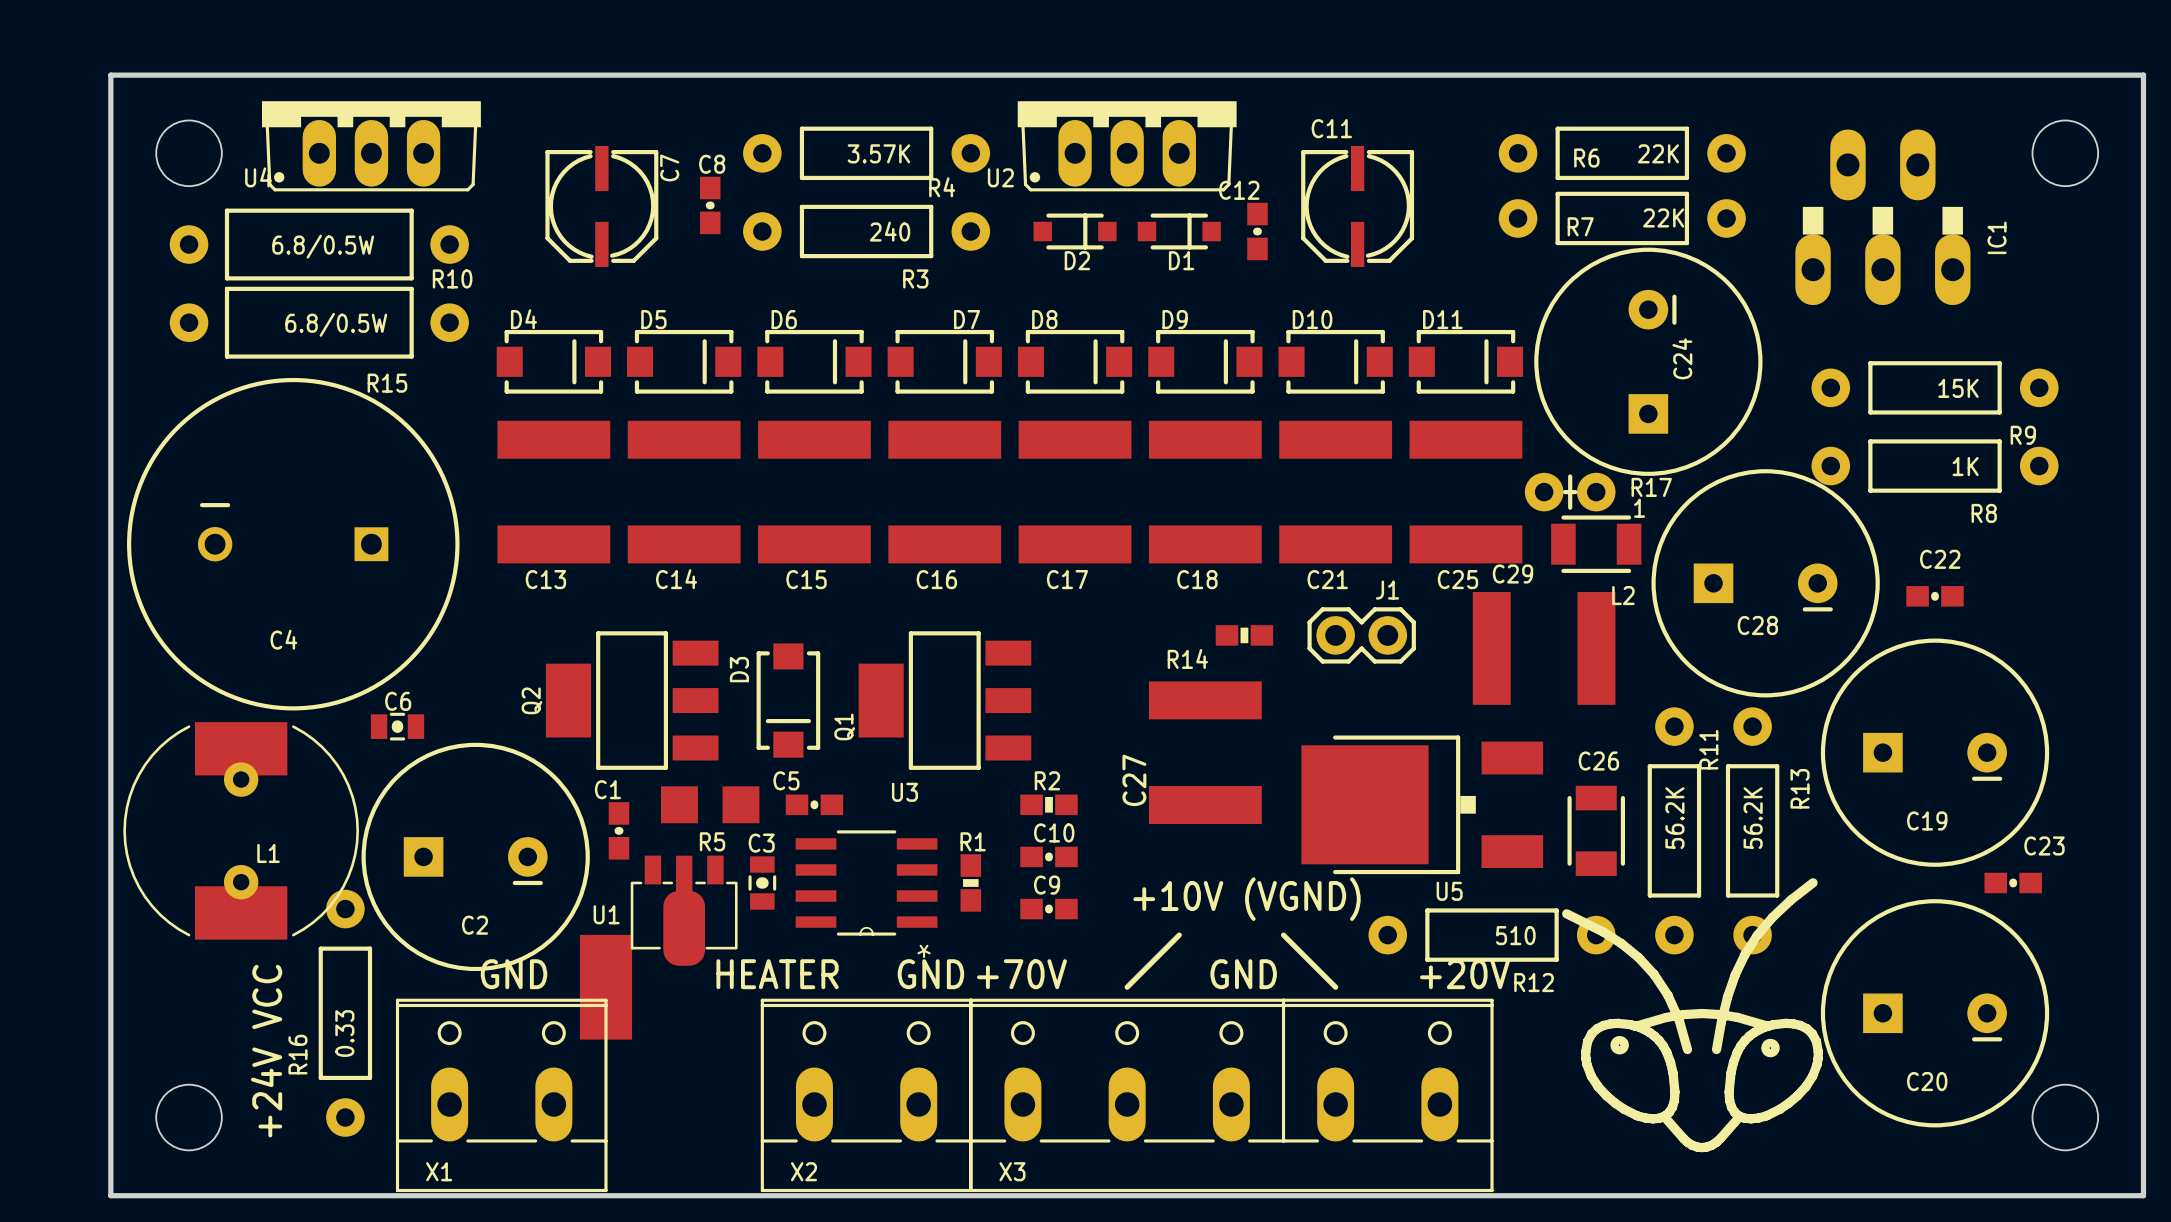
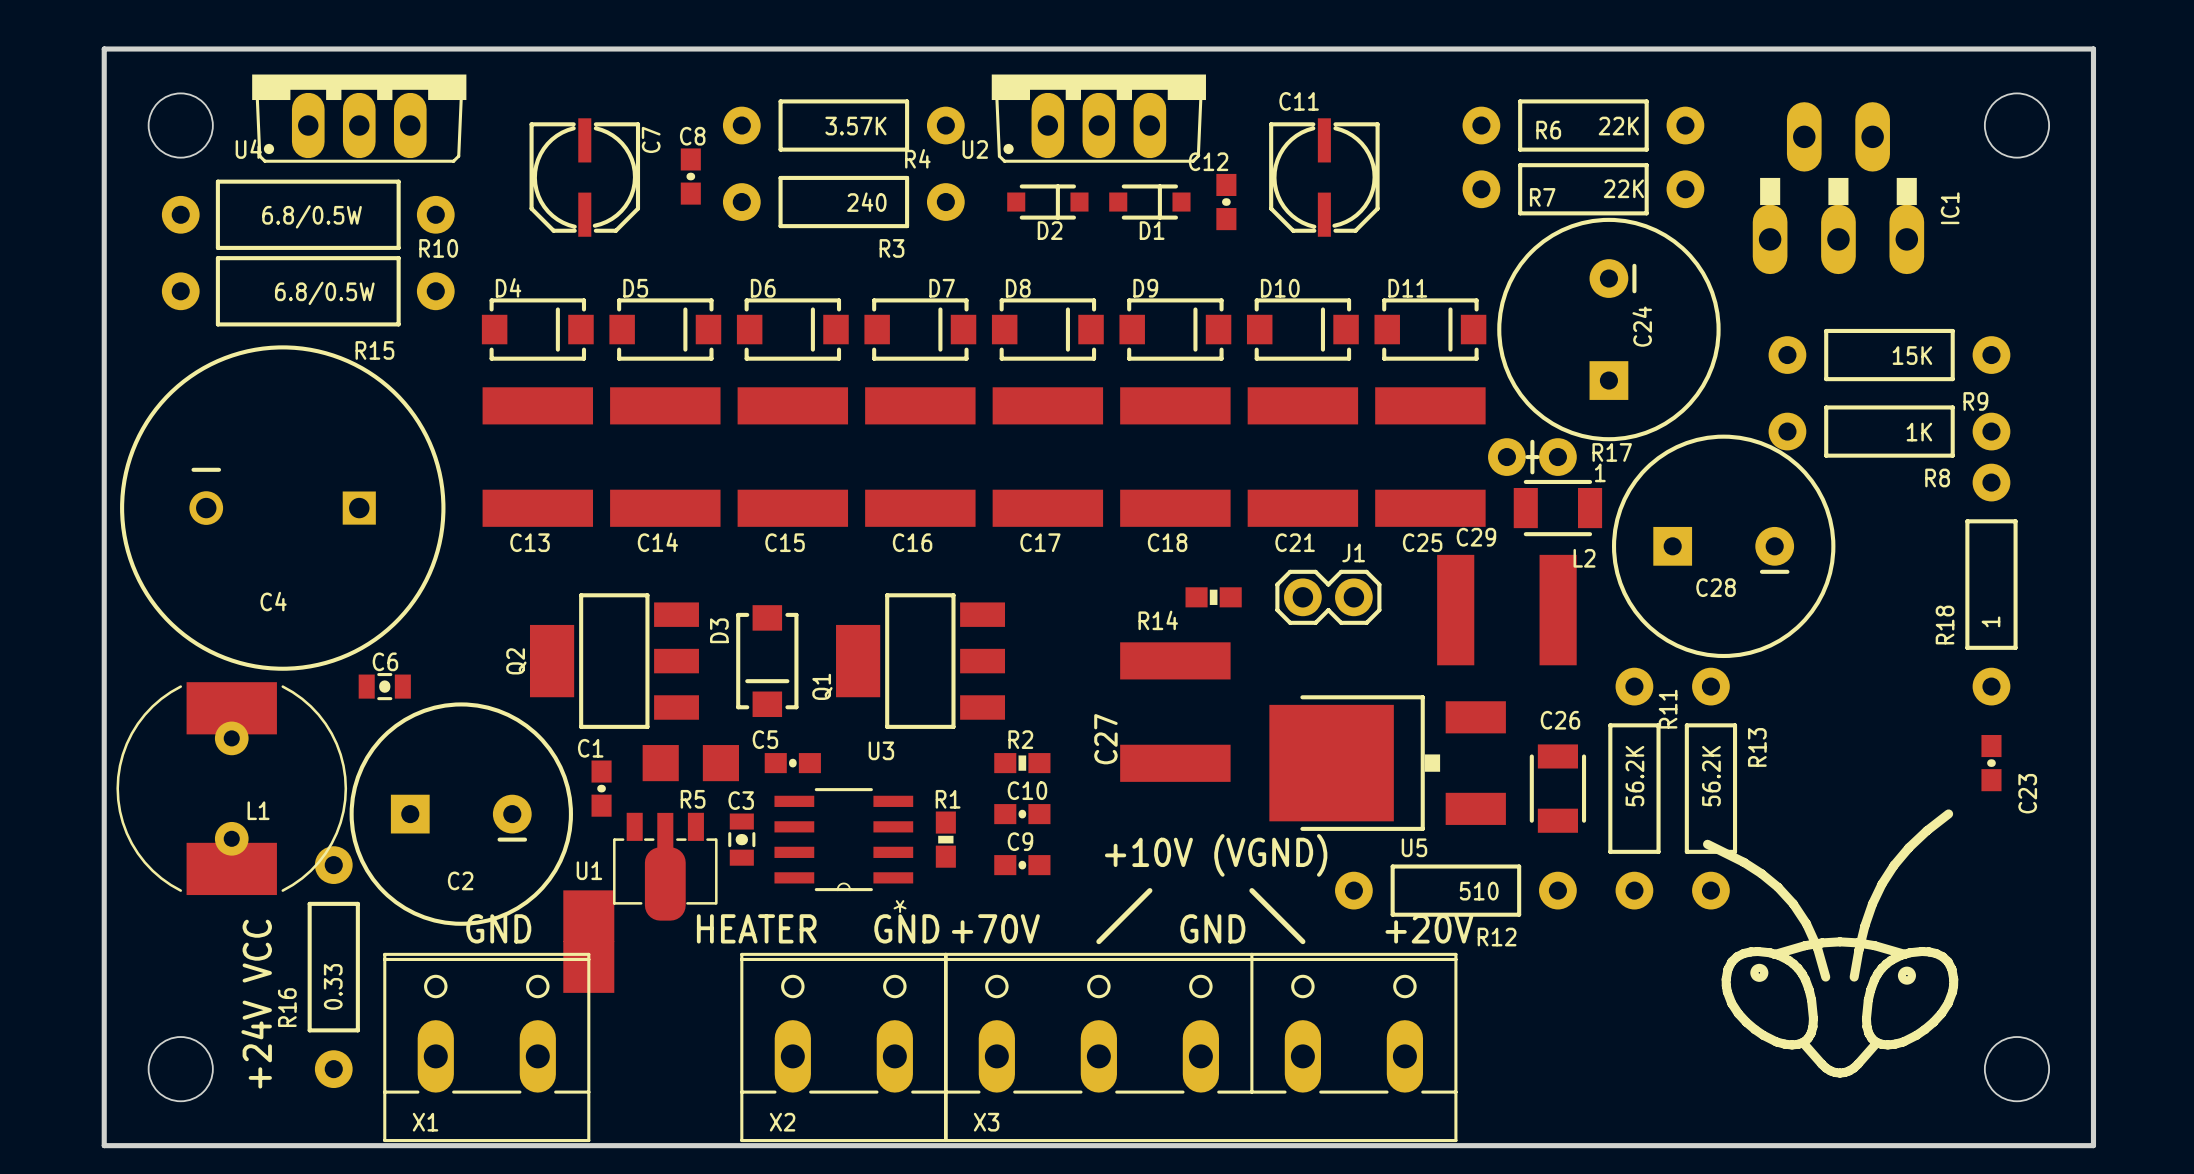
C22: (1935, 596) -> none
R18: none -> 1 (1991, 584)
C19: (1935, 752) -> none
C23 rotation: 0° (2013, 882) -> 90° clockwise (1991, 763)
C23 position: (2013, 882) -> (1991, 763)
C20: (1935, 1013) -> none
drawing position: (1692, 1015) -> (1830, 943)

